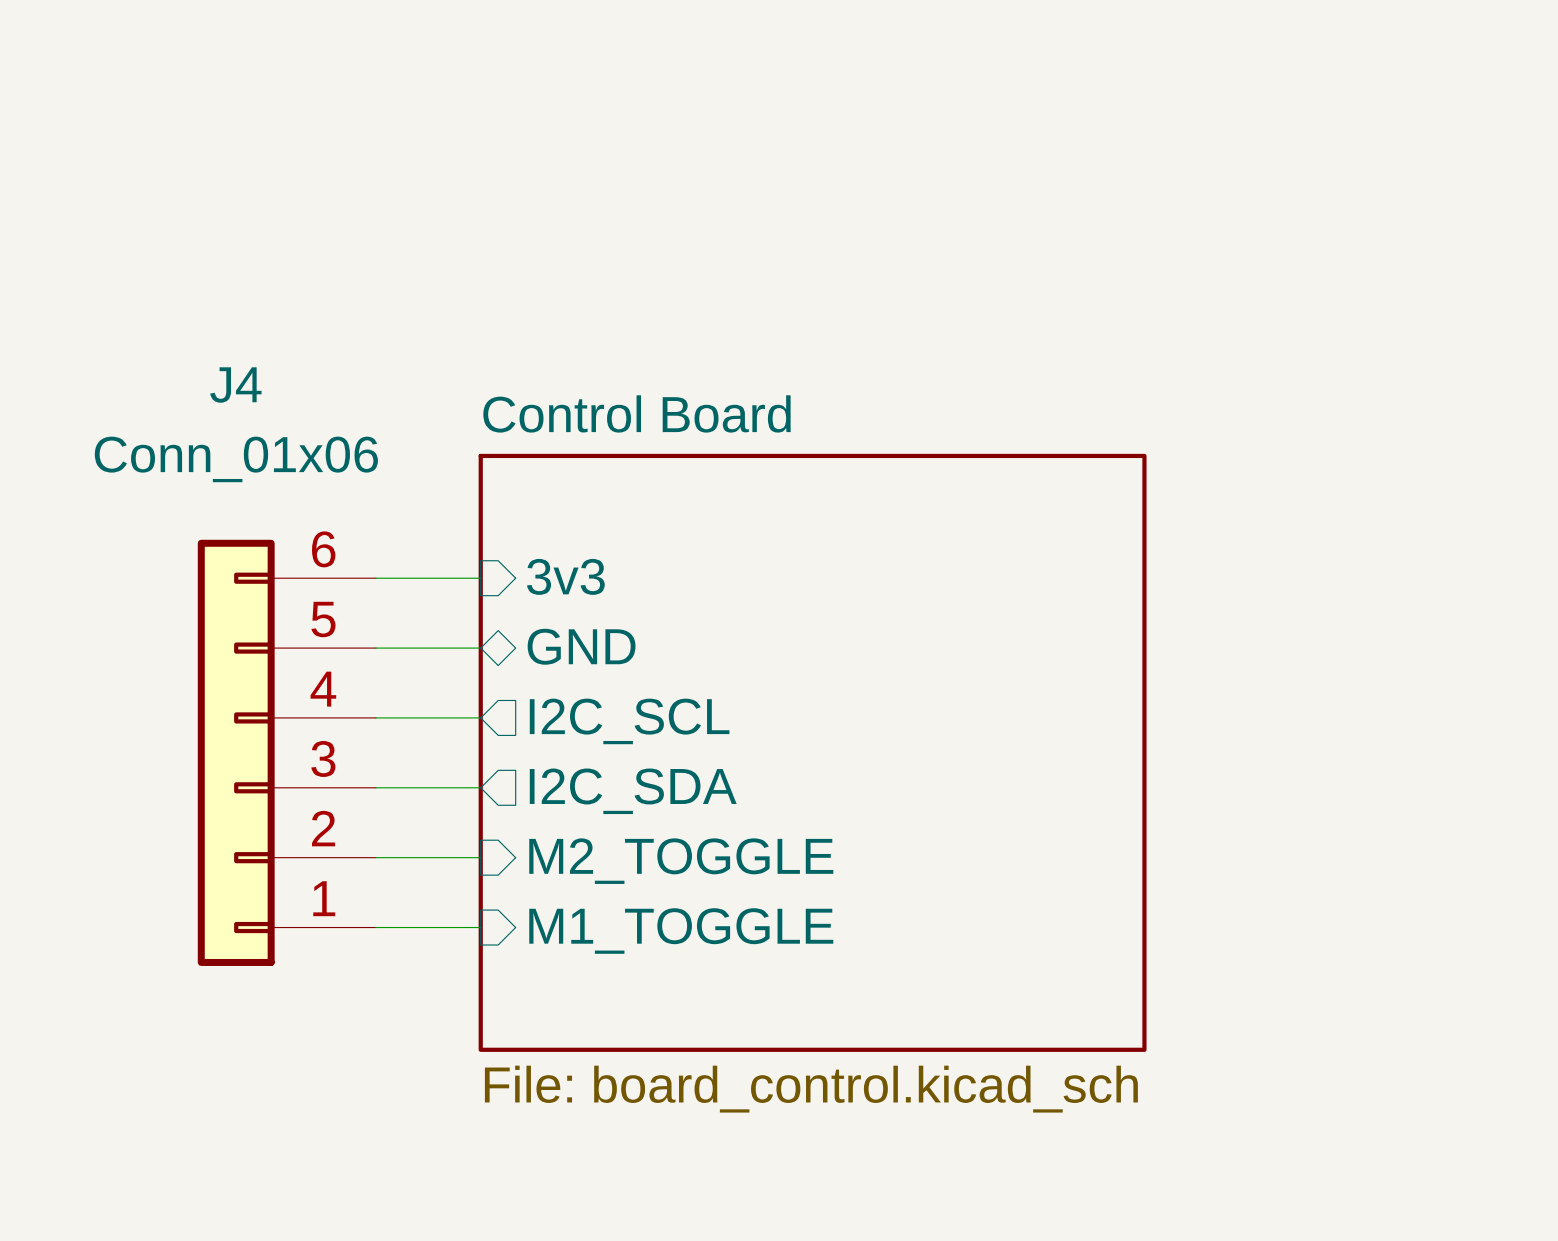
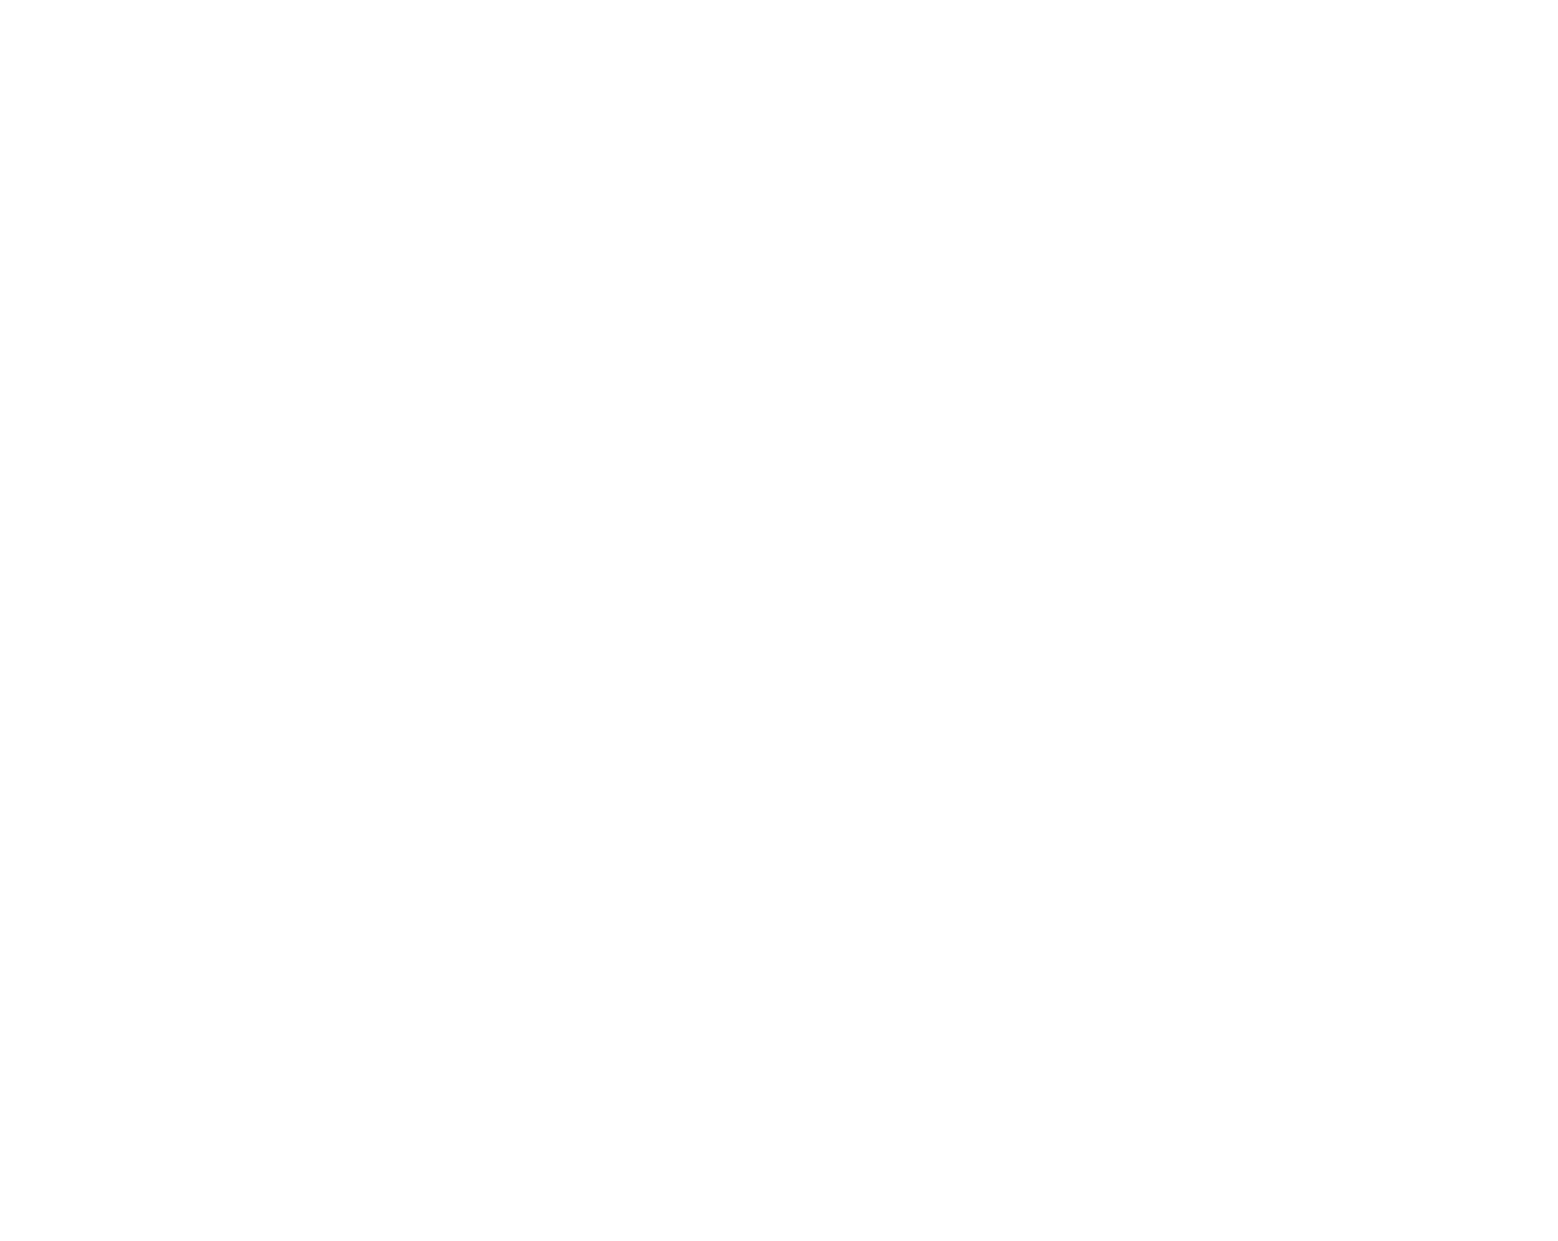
sheet pin: 3v3 (565, 576) -> none
wire: (375, 578) (480, 578) -> none
sheet pin: GND (581, 646) -> none
wire: (375, 648) (480, 648) -> none
wire: (375, 717) (480, 717) -> none
sheet pin: I2C_SCL (629, 721) -> none
J4: Conn_01x06 (286, 752) -> none
sheet Control Board: File: board_control.kicad_sch (812, 752) -> none
wire: (375, 787) (480, 787) -> none
sheet pin: I2C_SDA (633, 791) -> none
wire: (375, 857) (480, 857) -> none
sheet pin: M2_TOGGLE (681, 861) -> none
wire: (375, 927) (480, 927) -> none
sheet pin: M1_TOGGLE (681, 931) -> none

